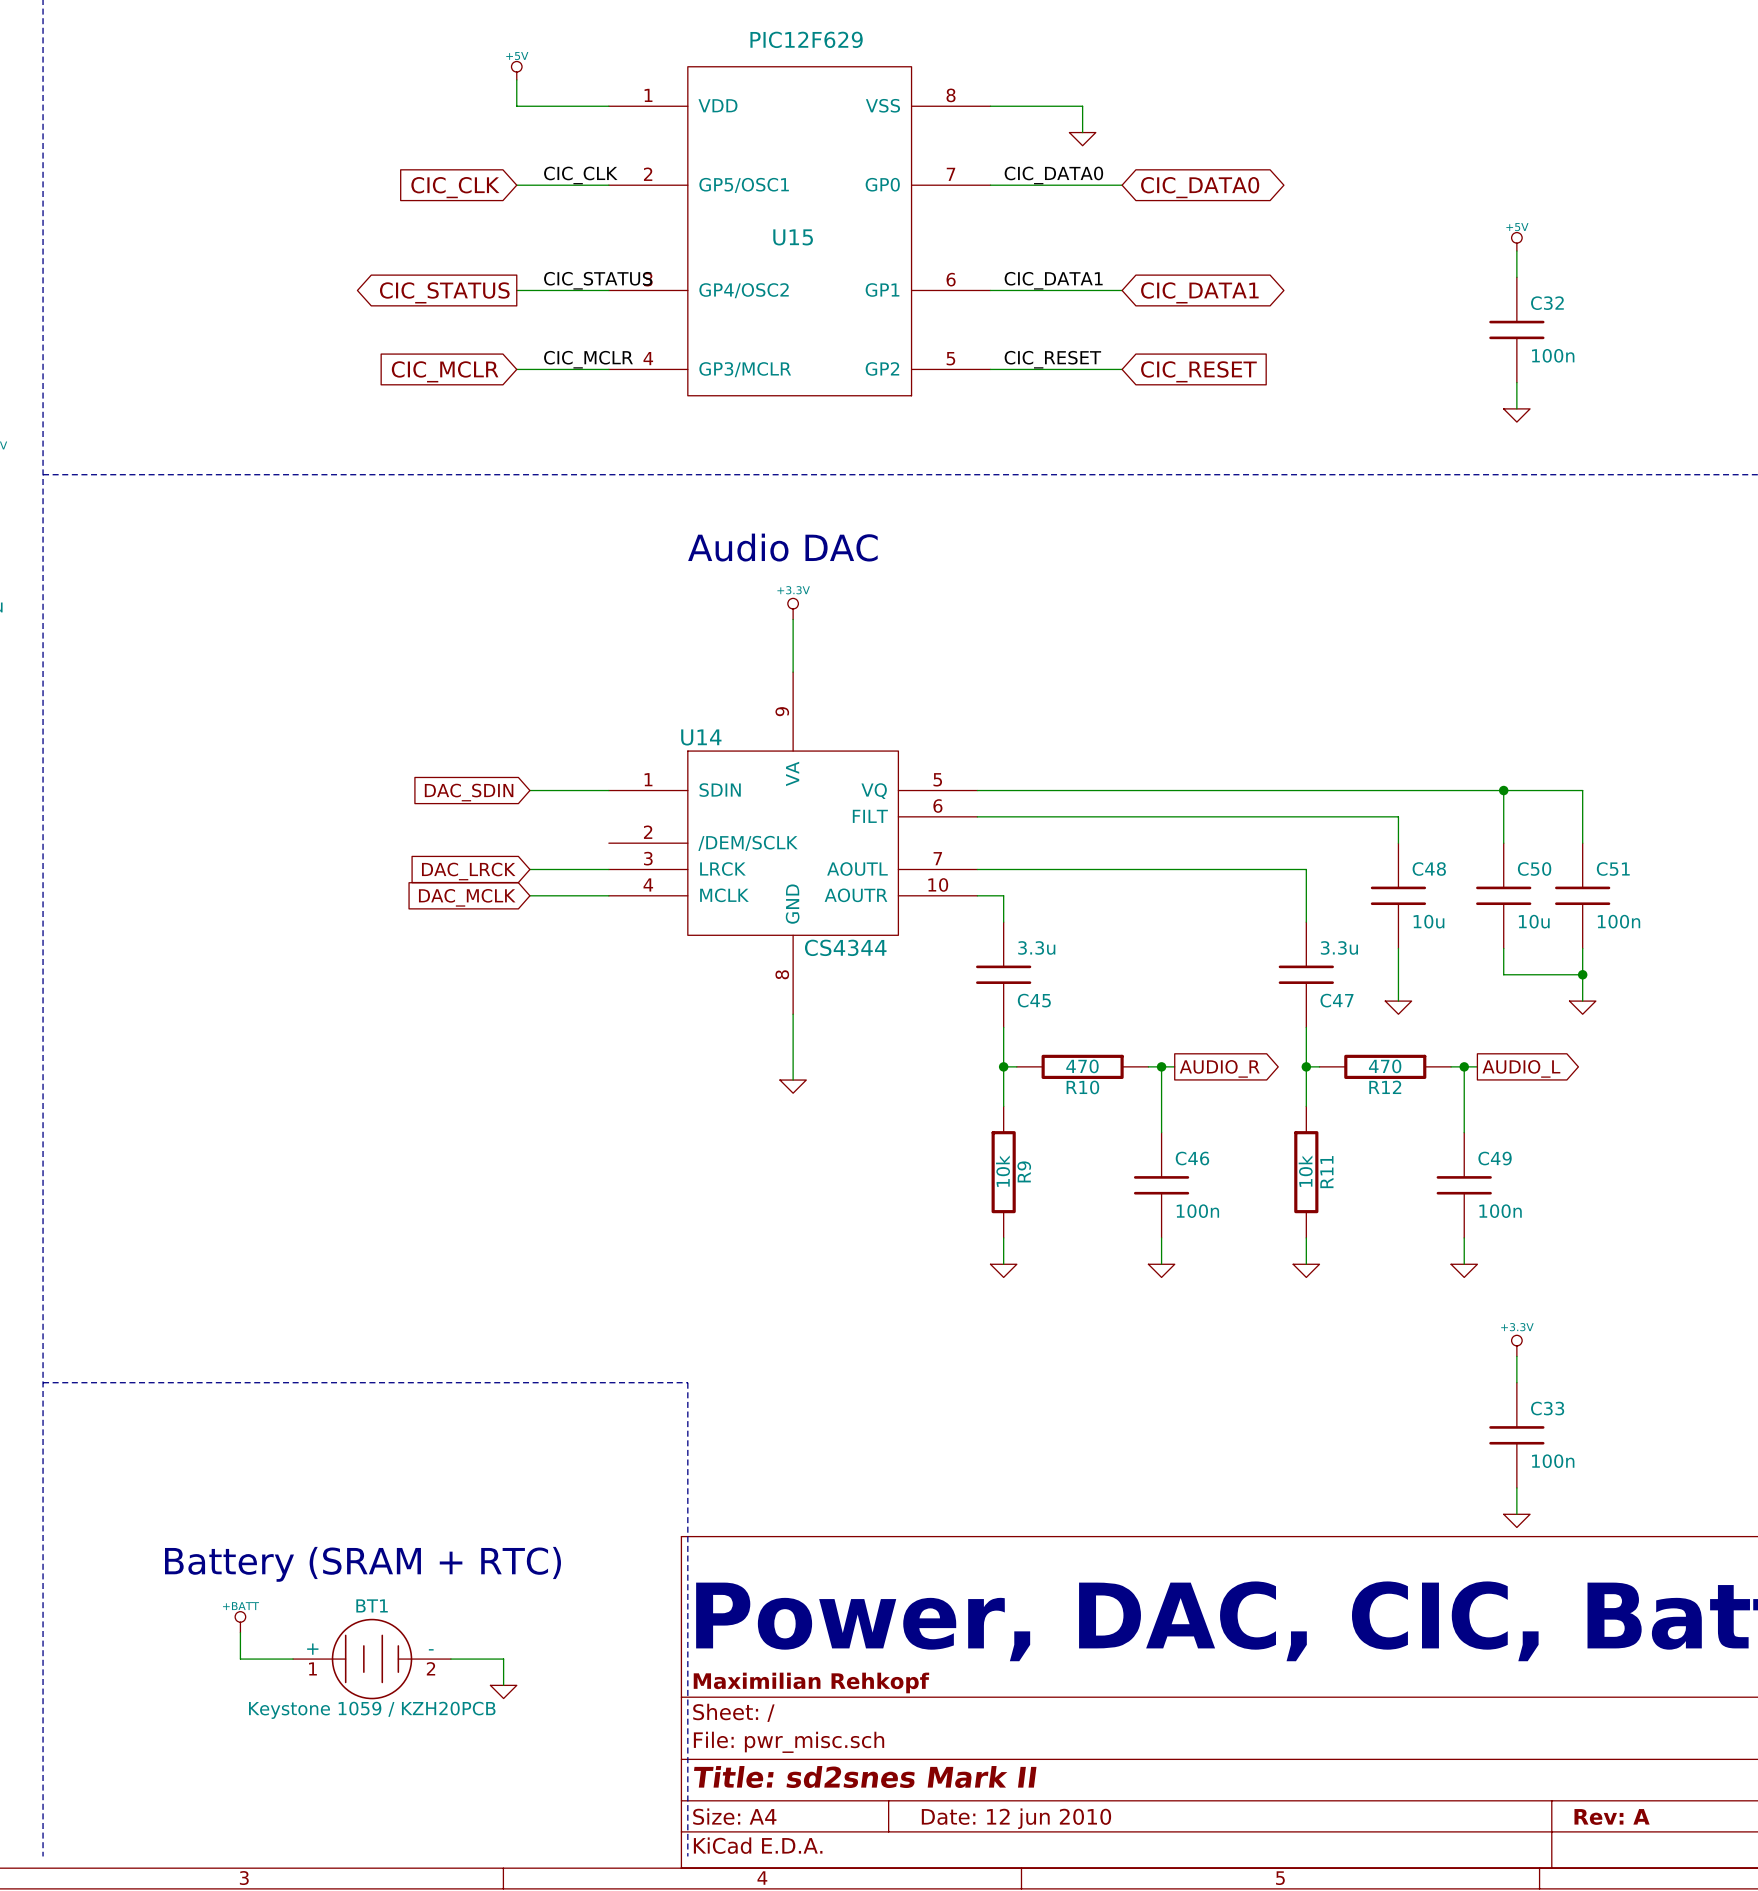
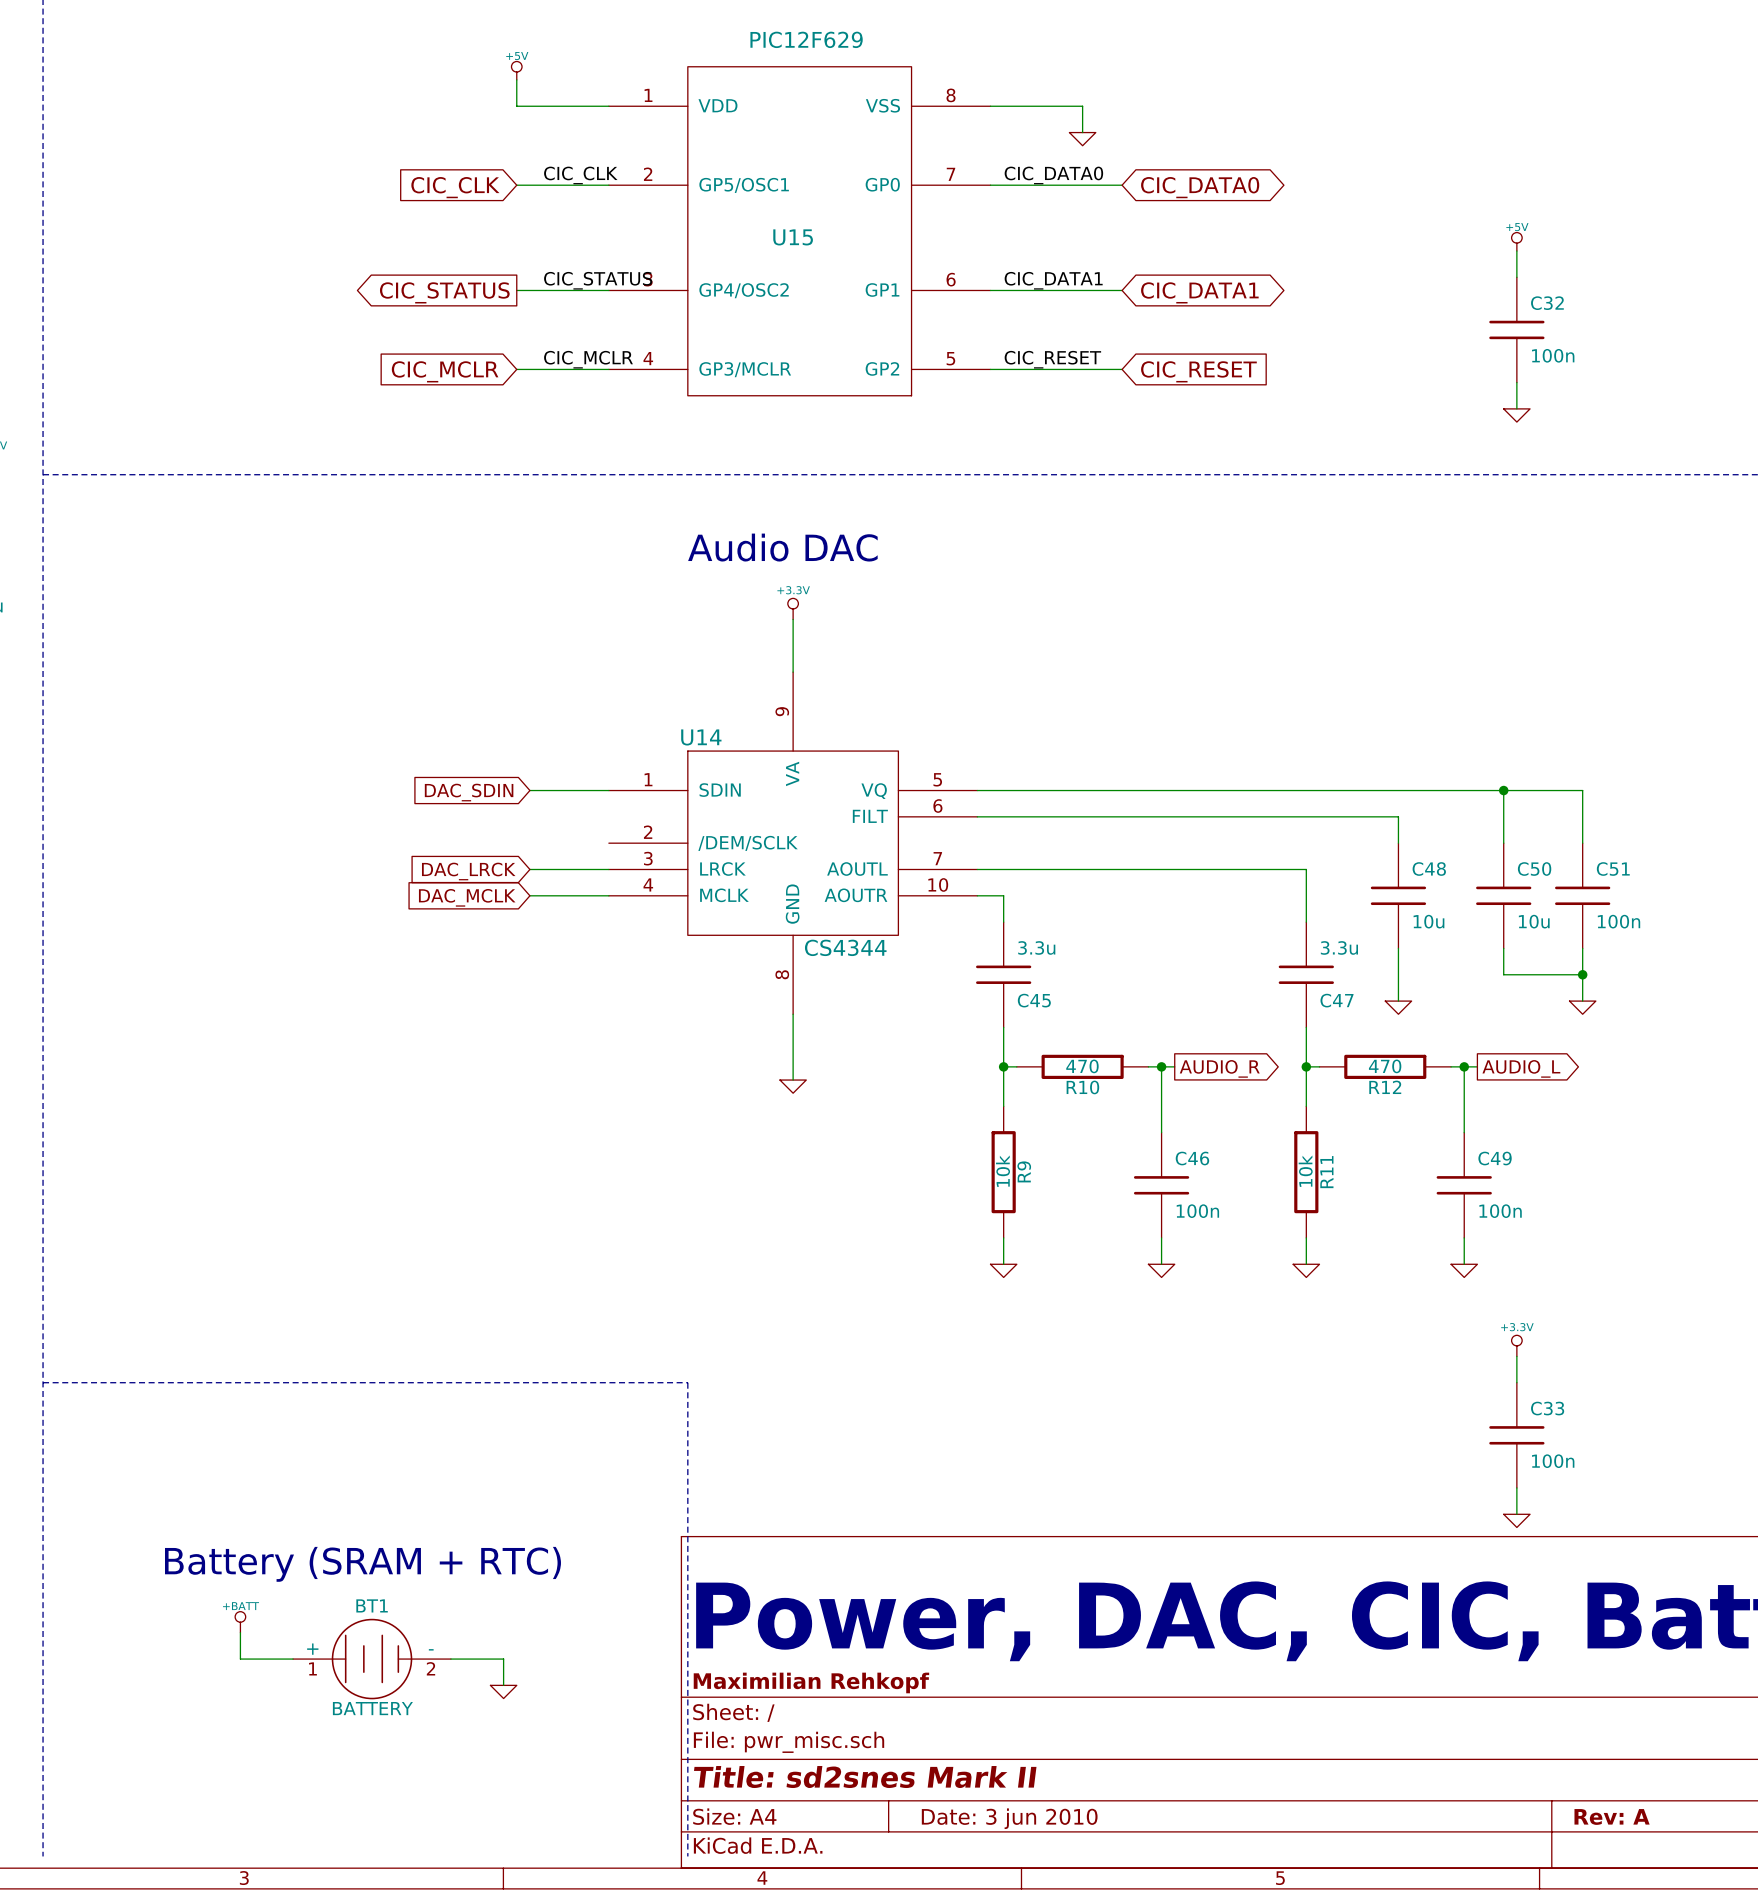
BT1 value: Keystone 1059 / KZH20PCB (372, 1710) -> BATTERY (372, 1708)
title block: Date: 12 jun 2010 (1016, 1818) -> Date: 3 jun 2010 (1009, 1818)

